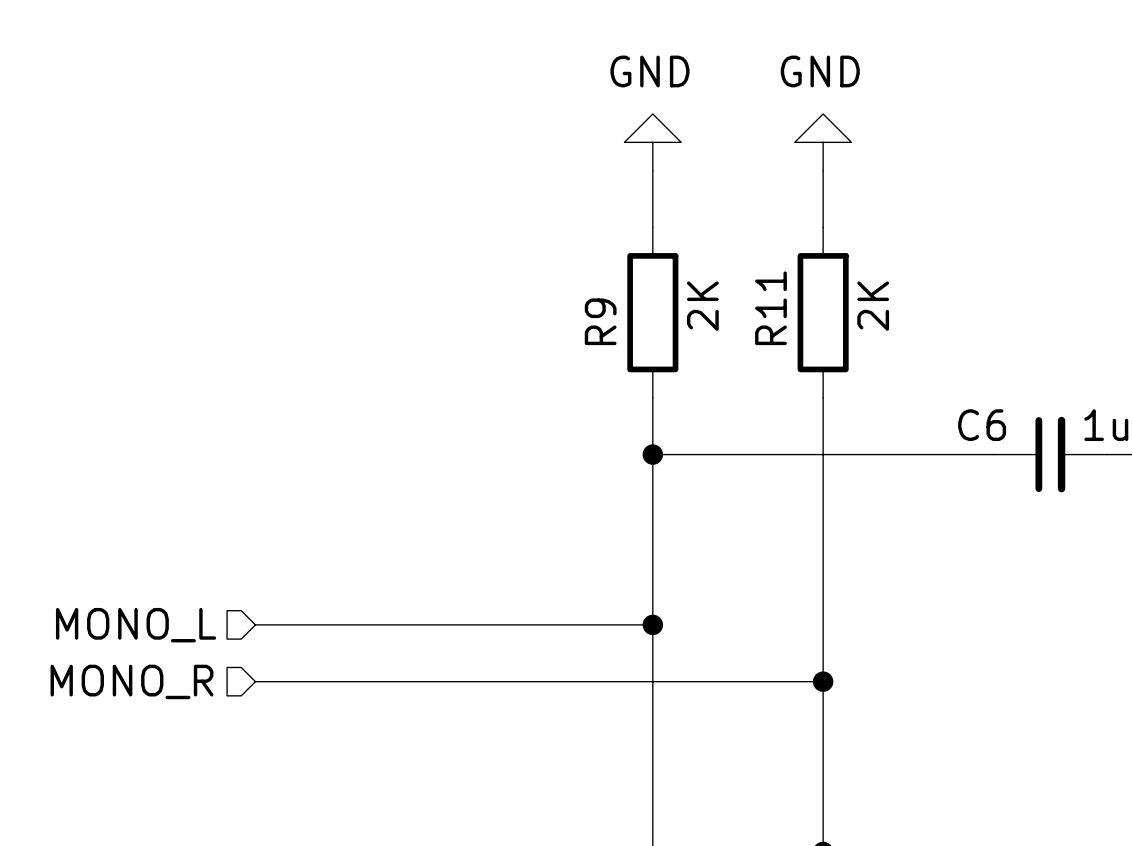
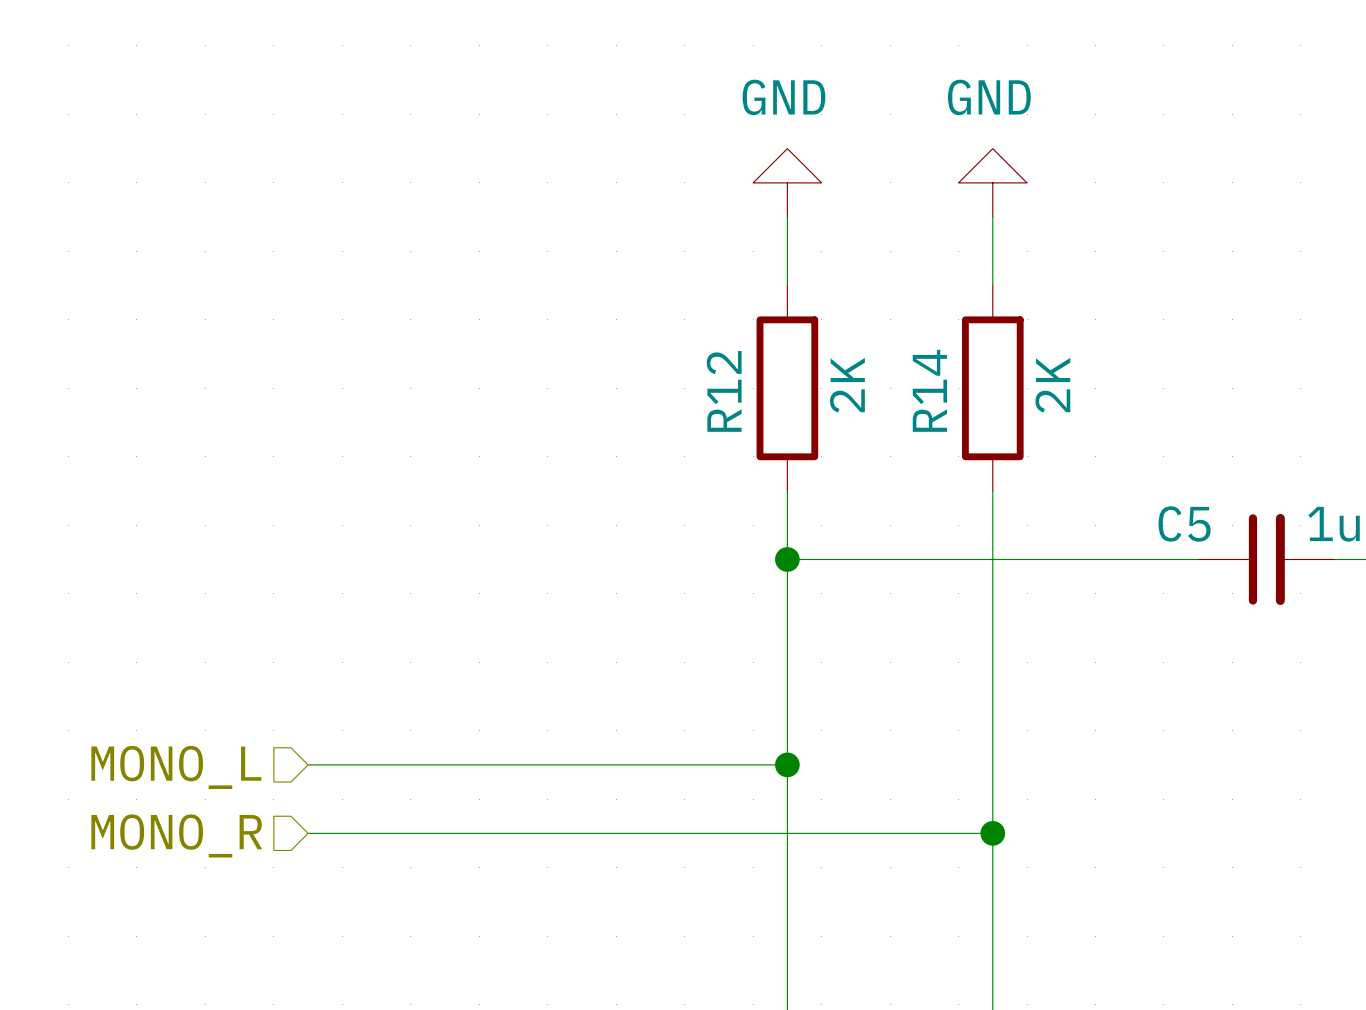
R11 name: R11 (770, 308) -> R14 (929, 390)
R9 name: R9 (600, 321) -> R12 (724, 391)
C6 name: C6 (982, 425) -> C5 (1184, 523)

